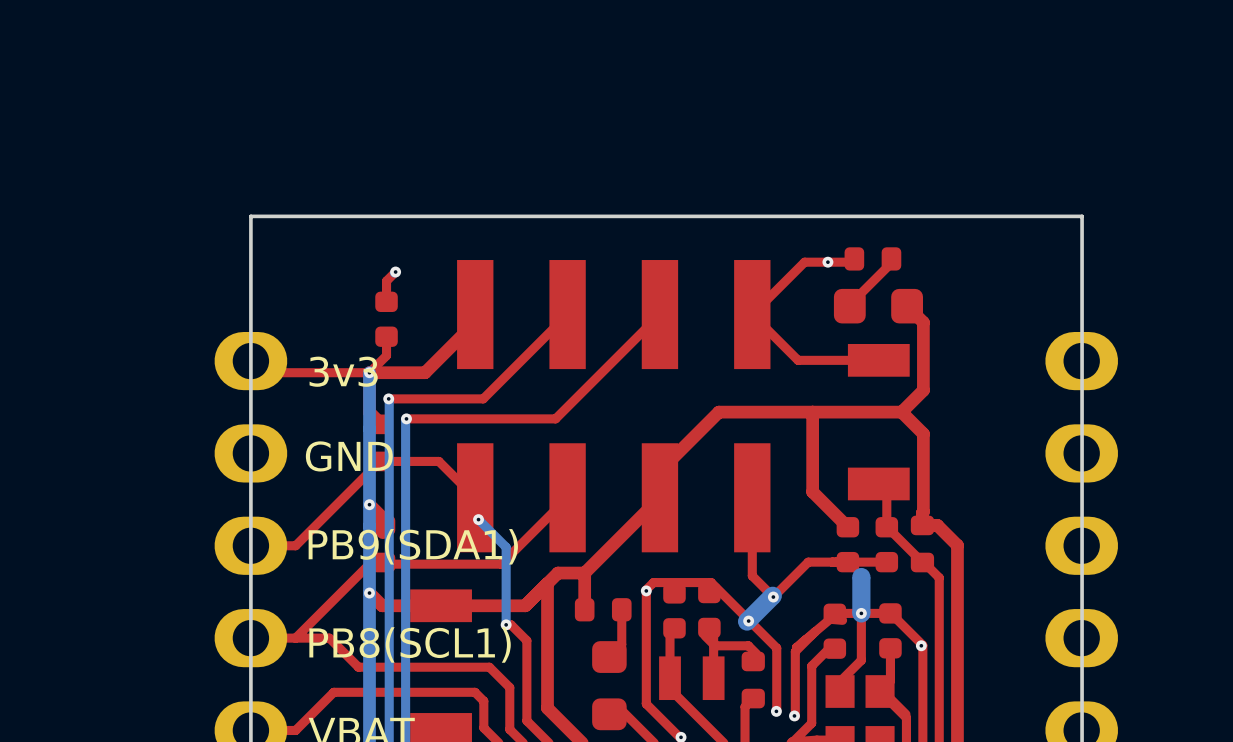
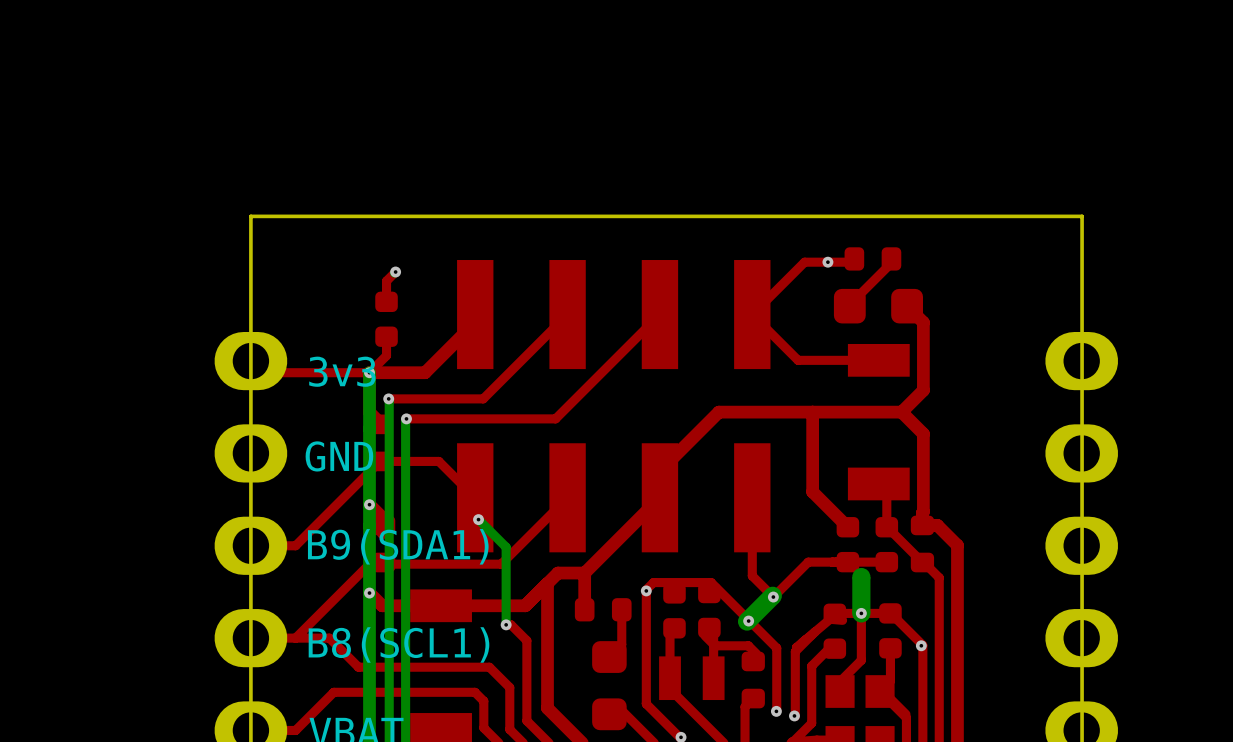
text: PB9(SDA1) (413, 546) -> B9(SDA1) (398, 546)
text: PB8(SCL1) (410, 644) -> B8(SCL1) (398, 644)

